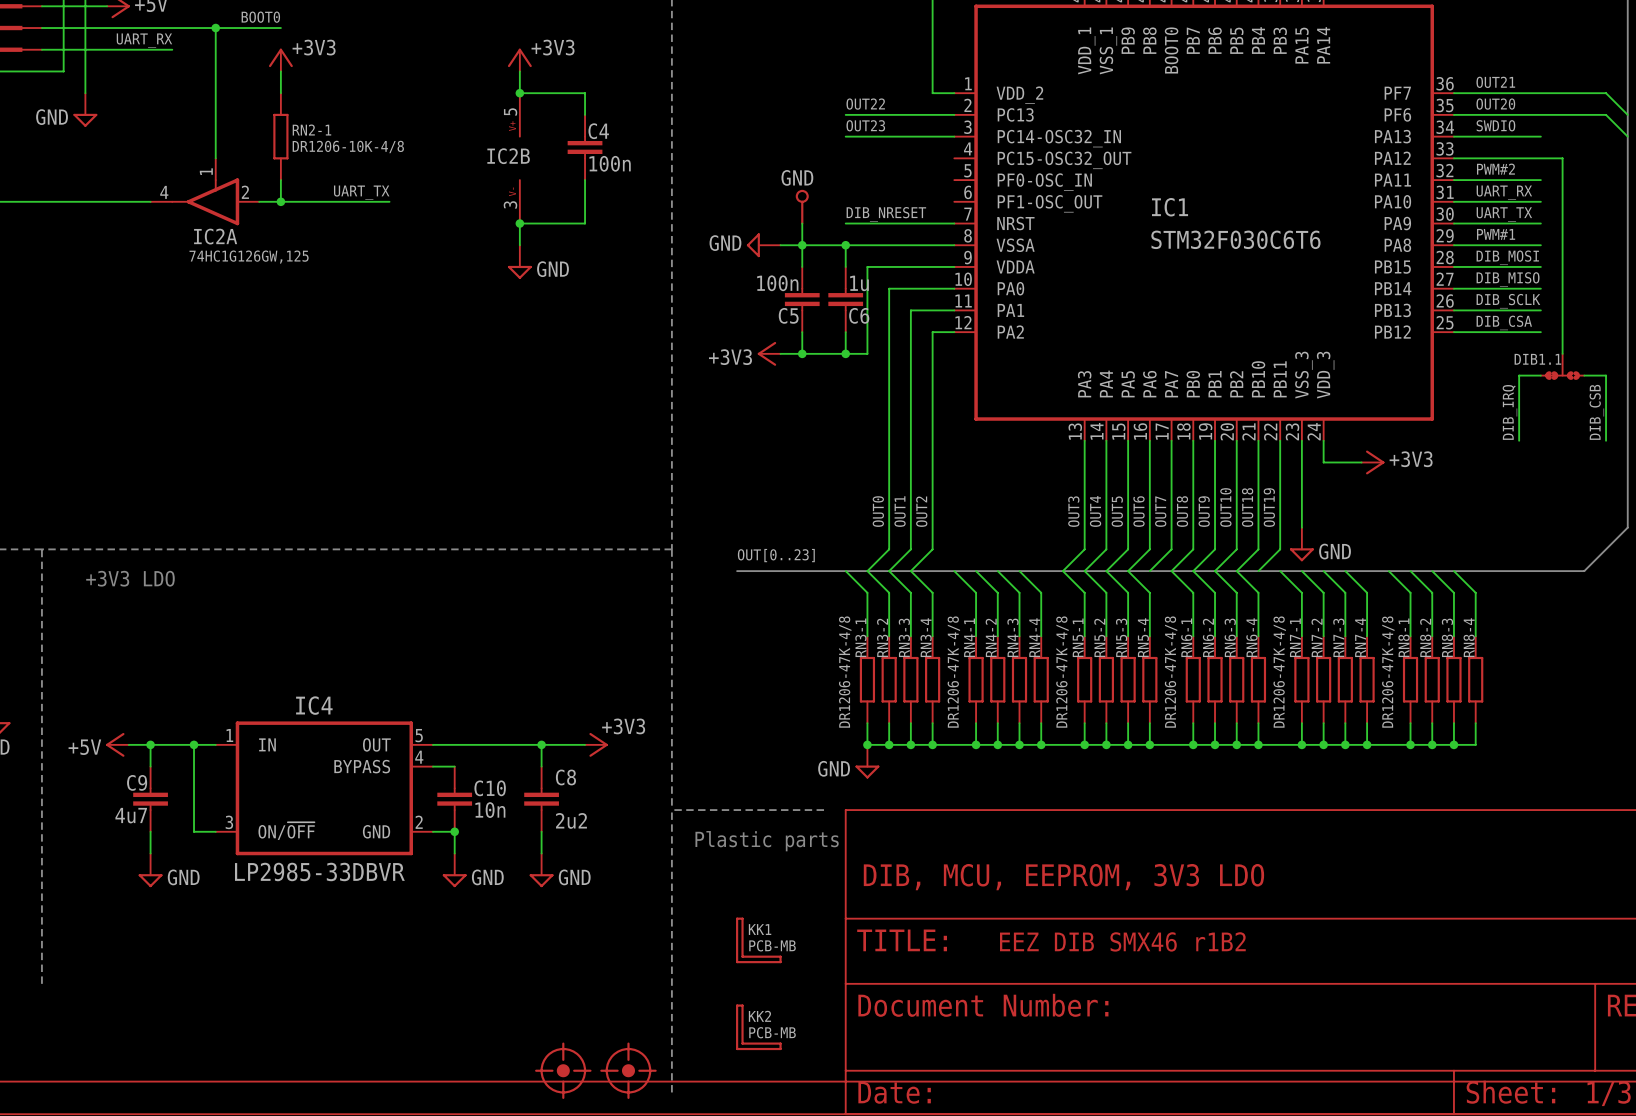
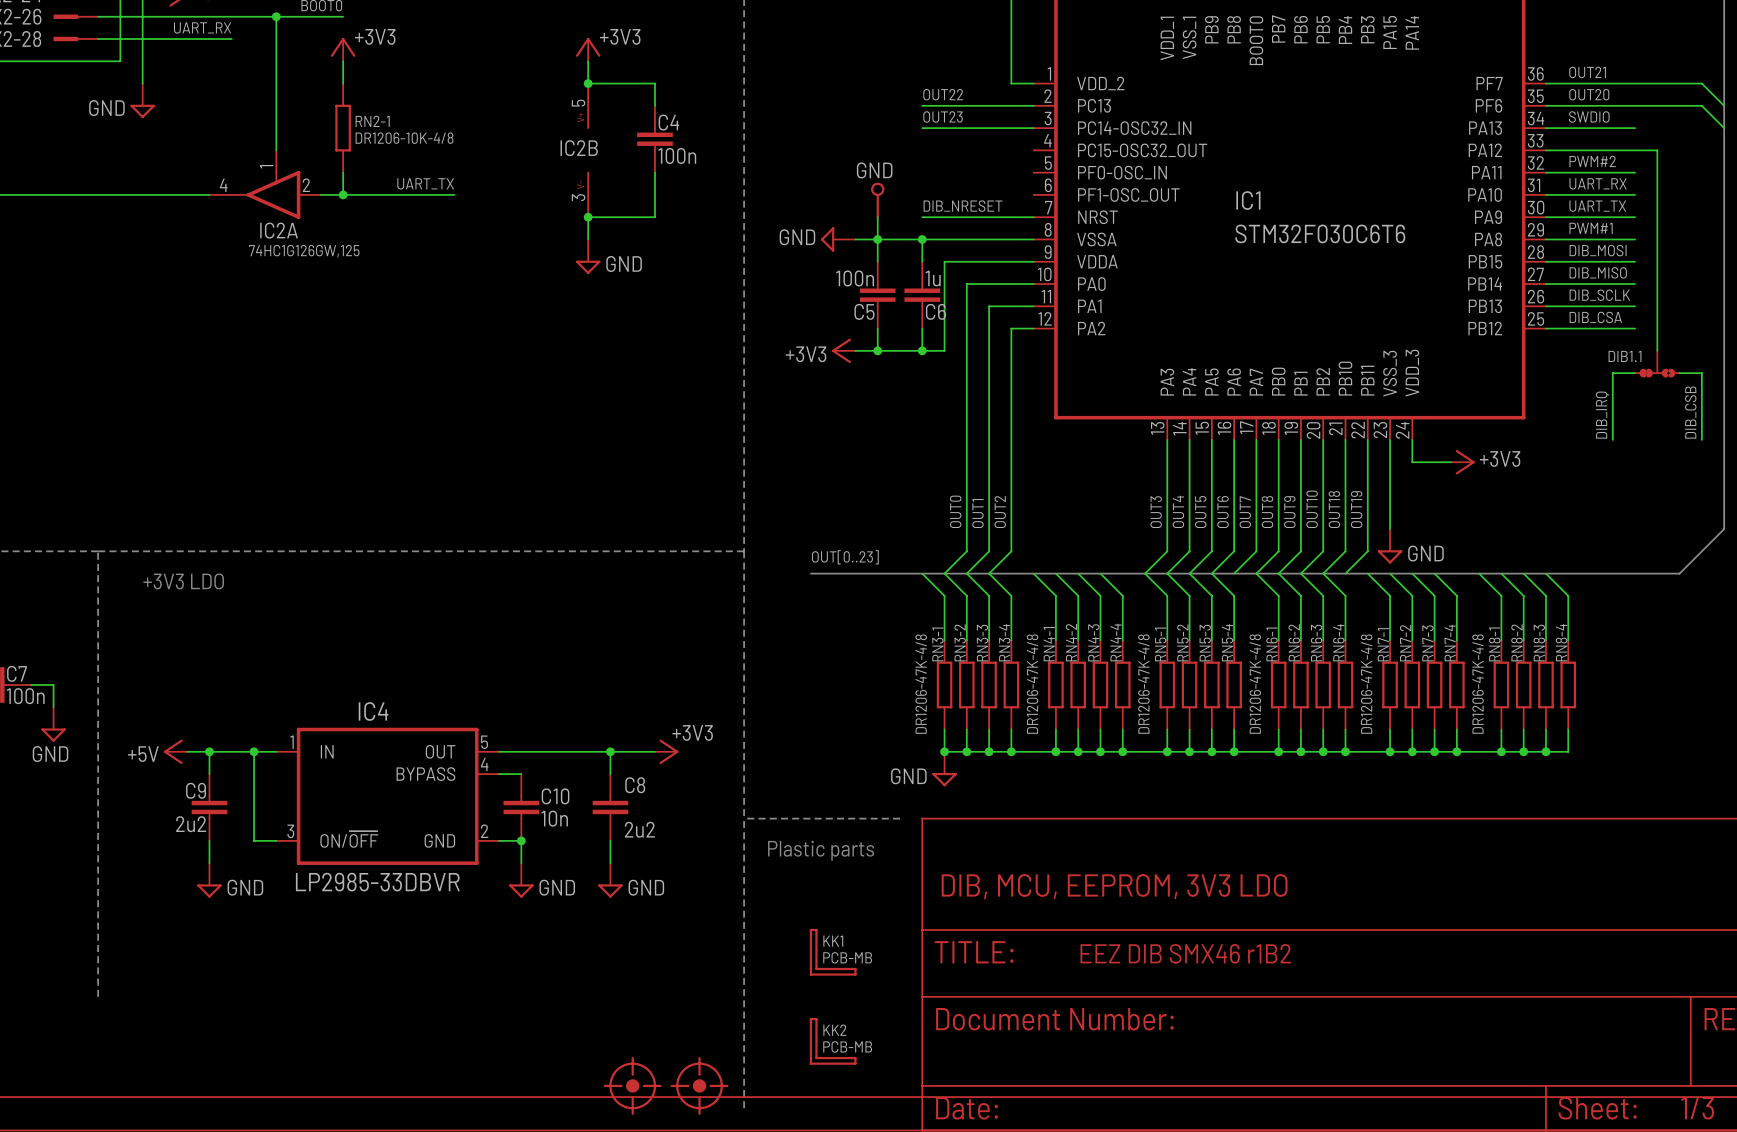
C9 value: 4u7 (131, 815) -> 2u2 (191, 824)

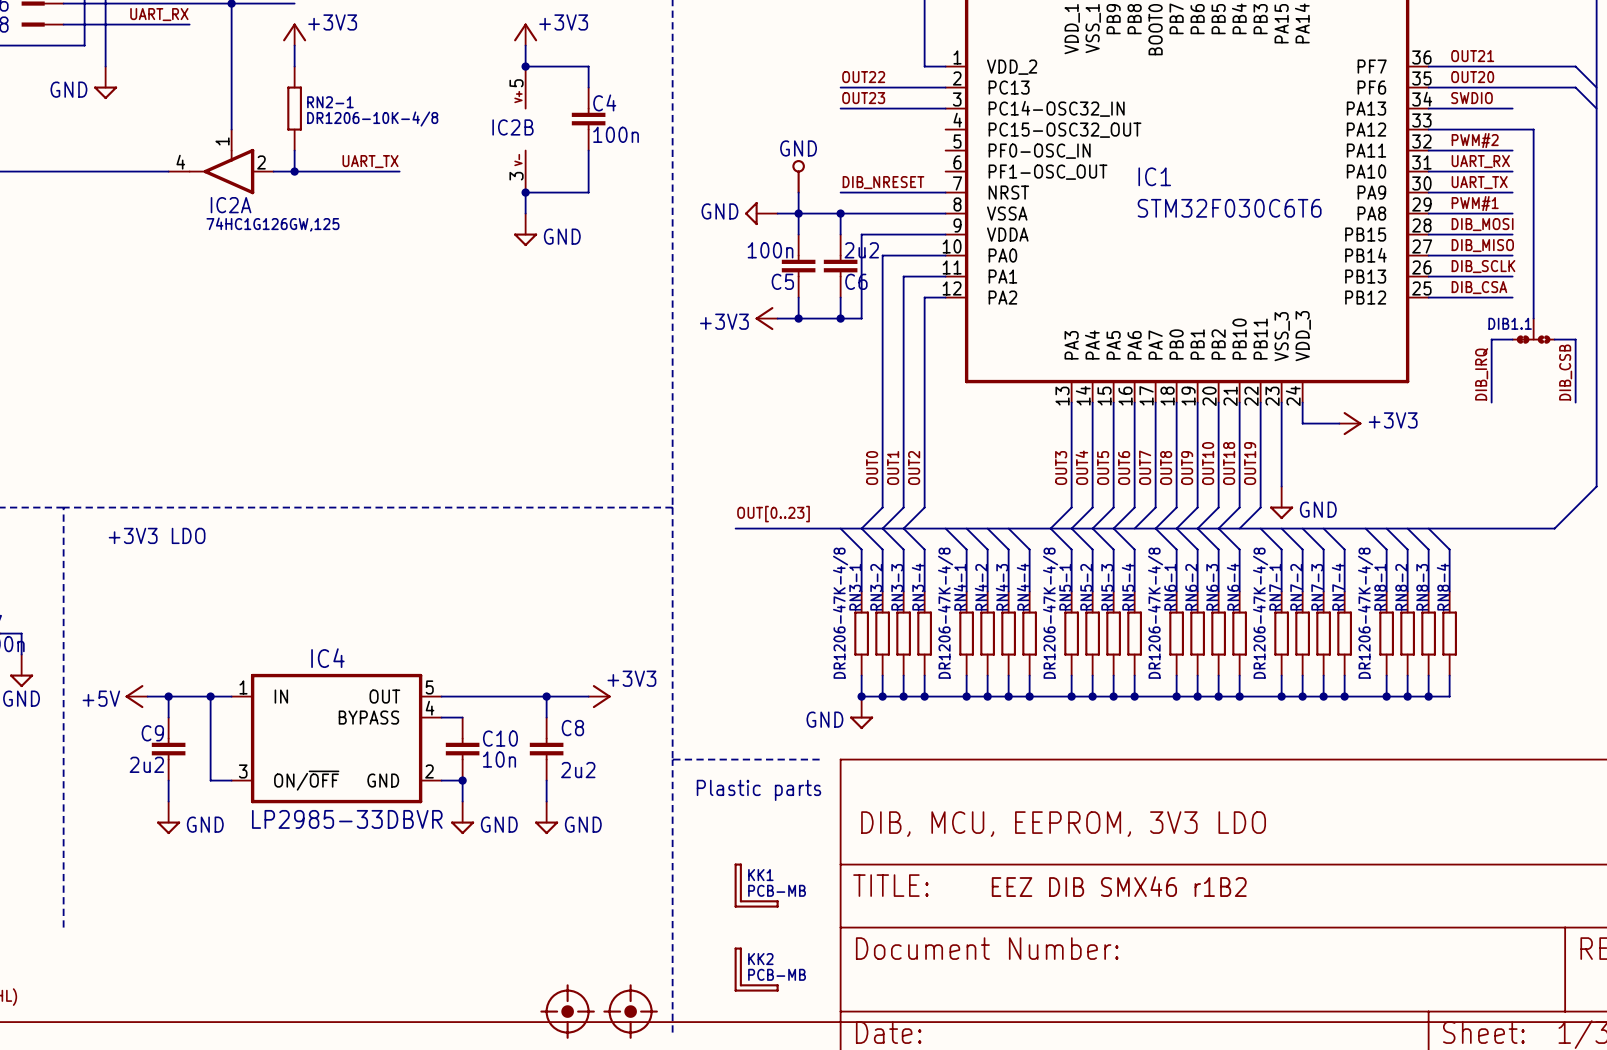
C6 value: 1u (933, 278) -> 2u2 (861, 250)

